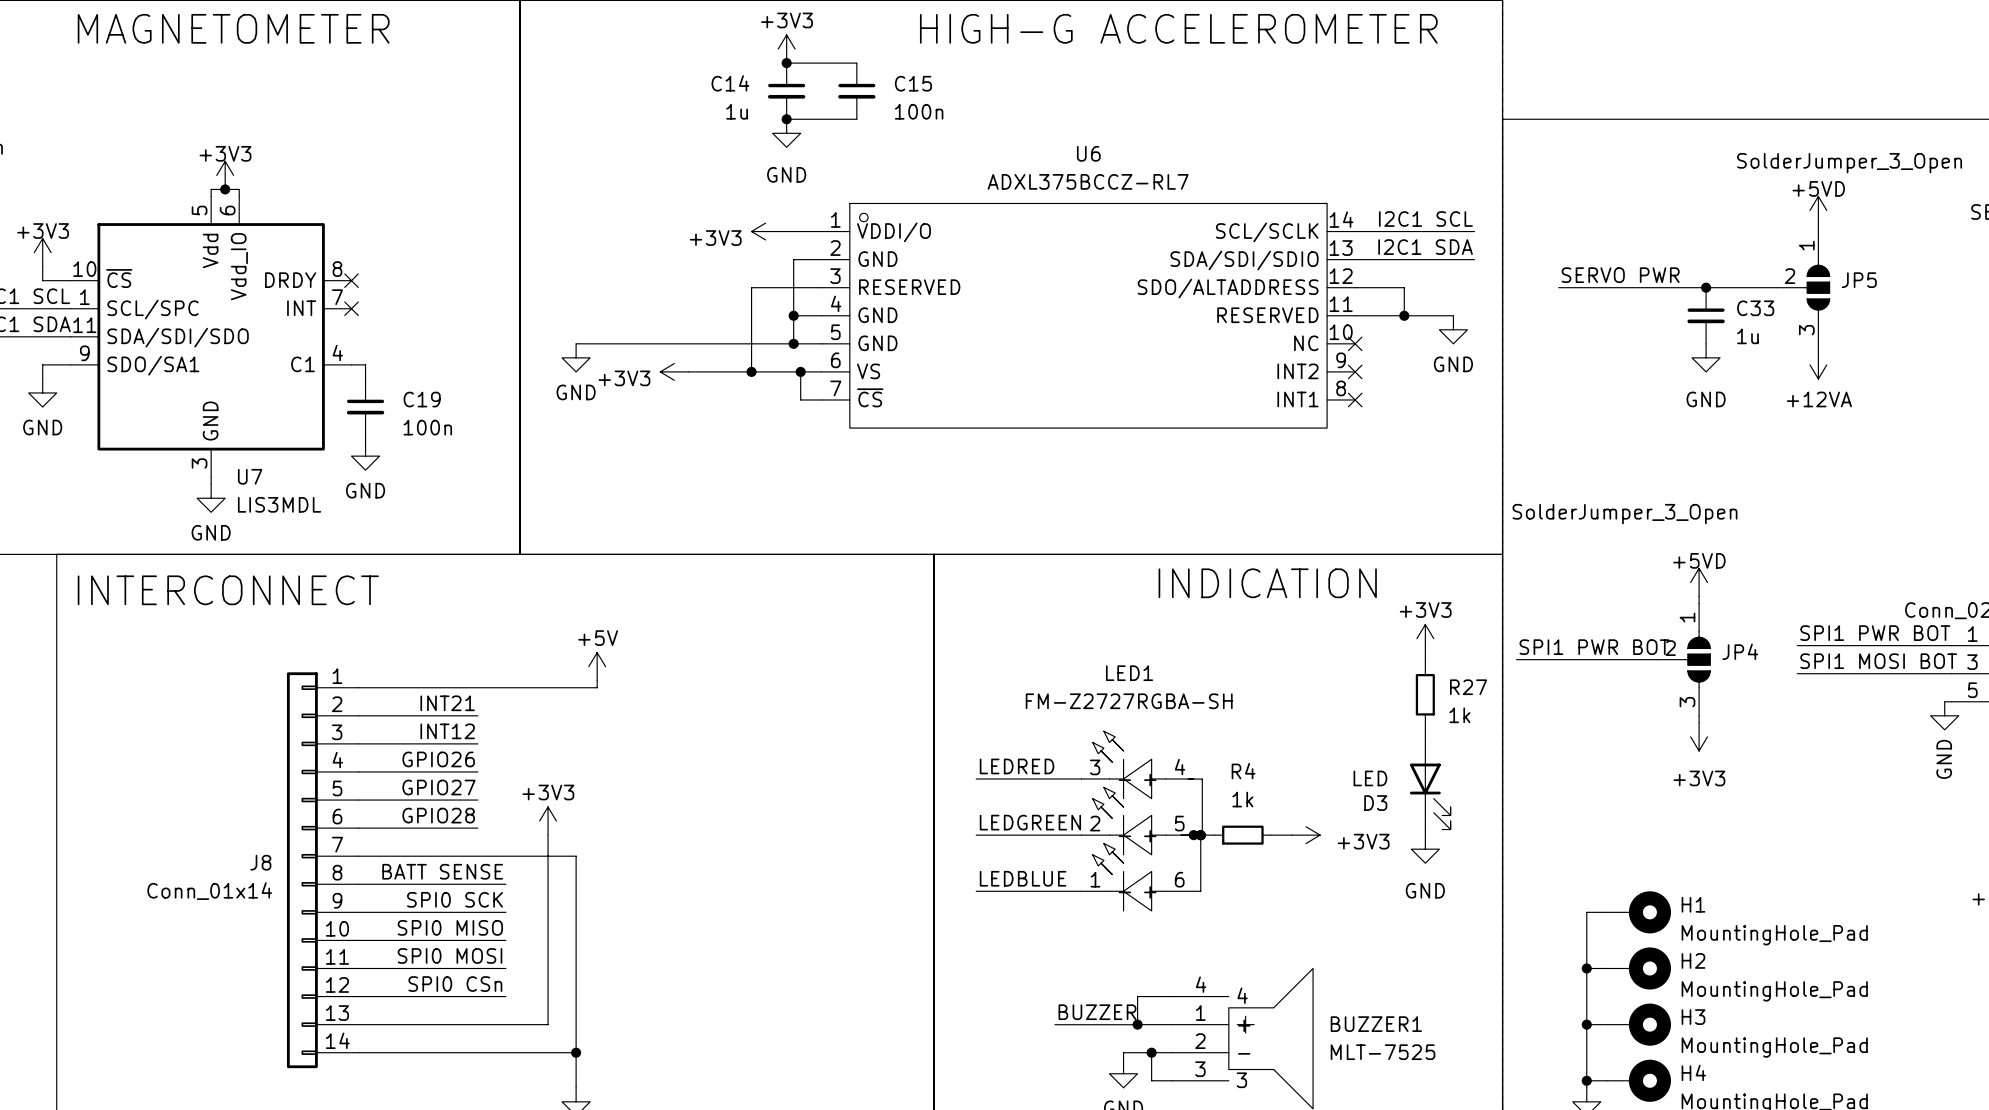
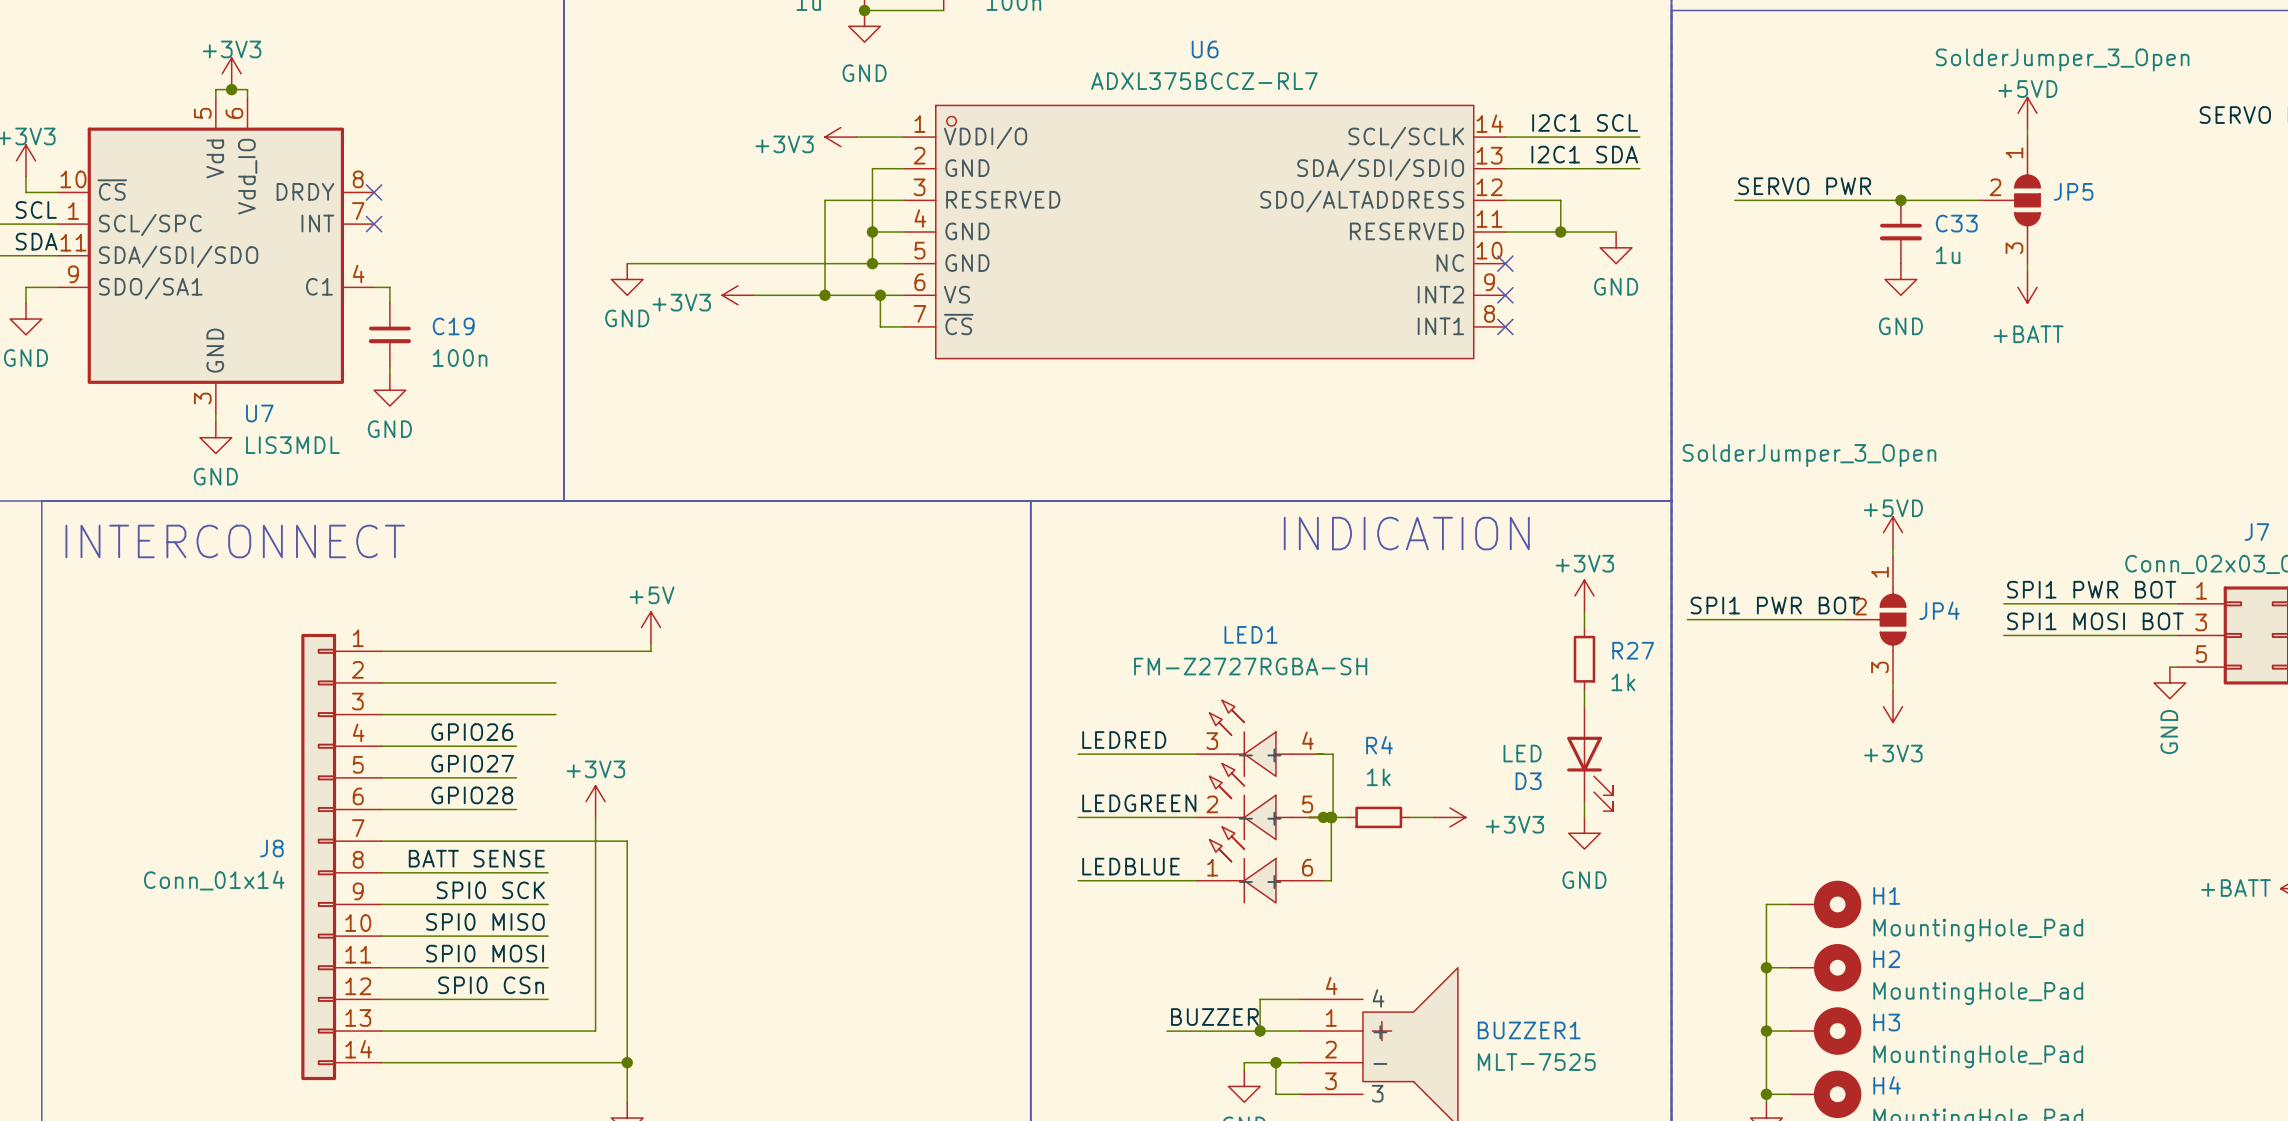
power symbol: +12VA (1818, 364) -> +BATT (2027, 287)
label: INT21 (447, 703) -> none
wire: none -> (516, 682) (556, 682)
label: INT12 (447, 731) -> none
wire: none -> (516, 714) (556, 714)

